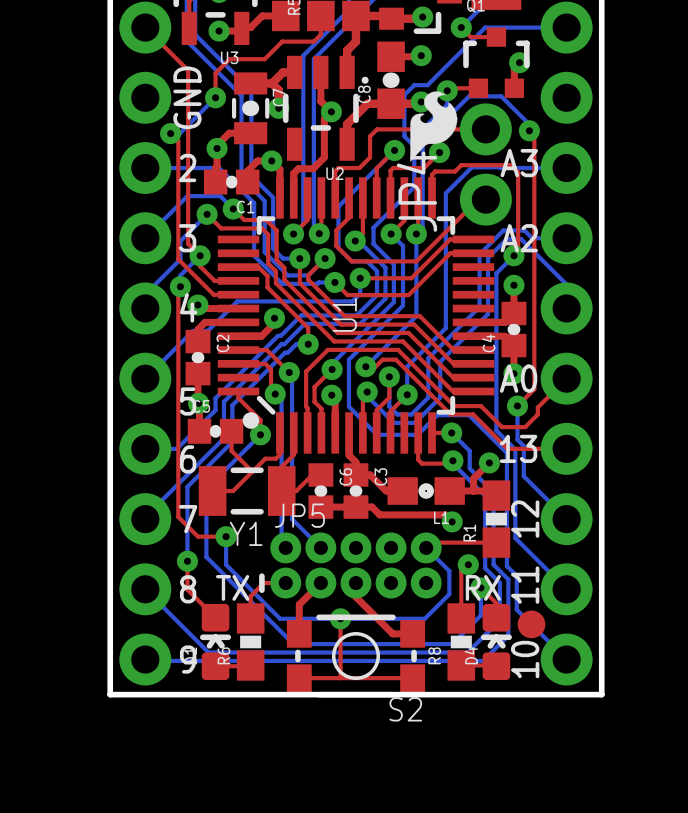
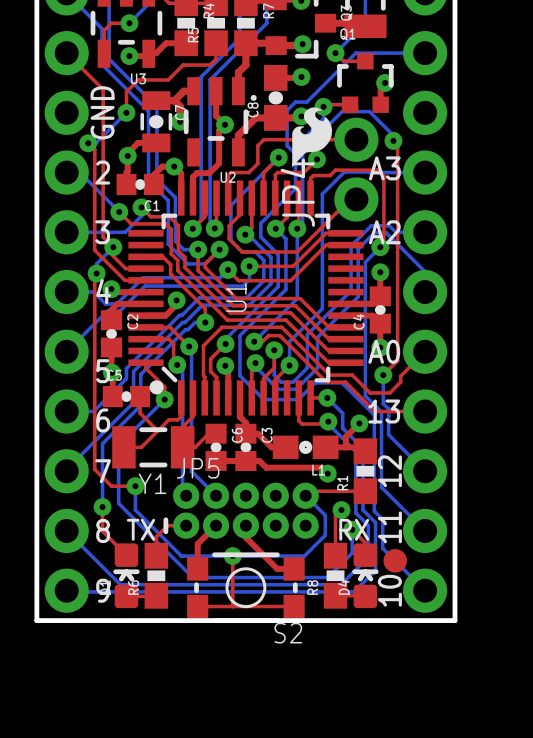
bottom track: (160, 168) (219, 168) (254, 203) (254, 255) (282, 283) (334, 282) -> (66, 292) (93, 292) (105, 303) (116, 303) (143, 277) (220, 277) (228, 269)
bottom track: (233, 209) (220, 196) (187, 196) (145, 238) -> (141, 207) (141, 216) (125, 232) (66, 232)
bottom track: (207, 214) (180, 241) (180, 259) (145, 294) (145, 308) -> (119, 211) (79, 172)

